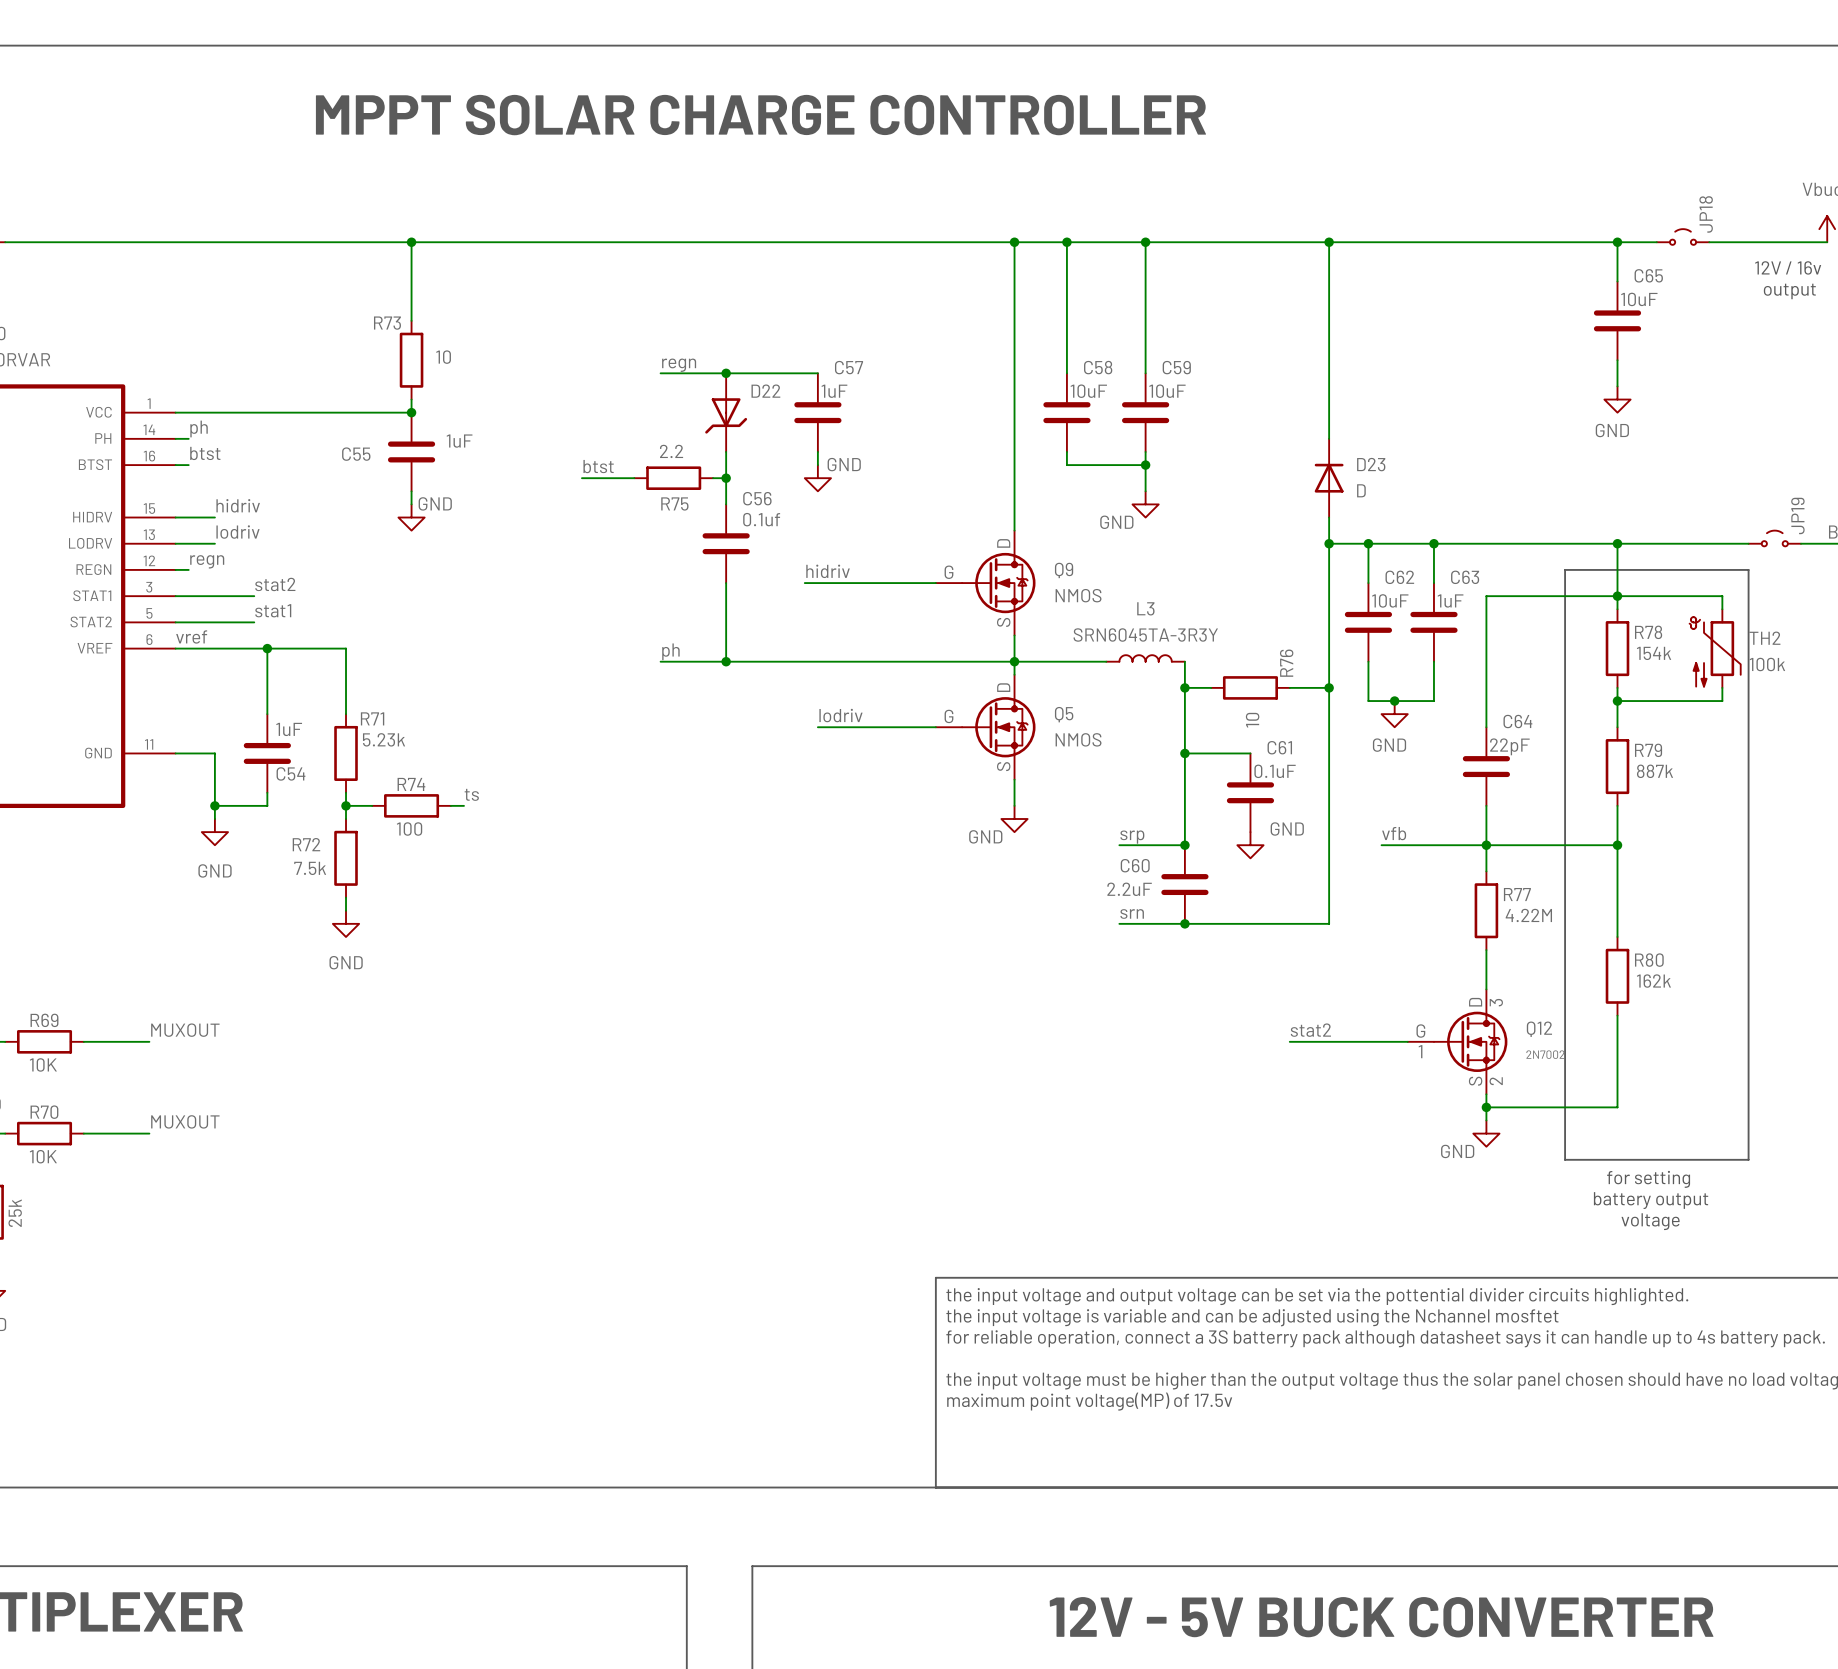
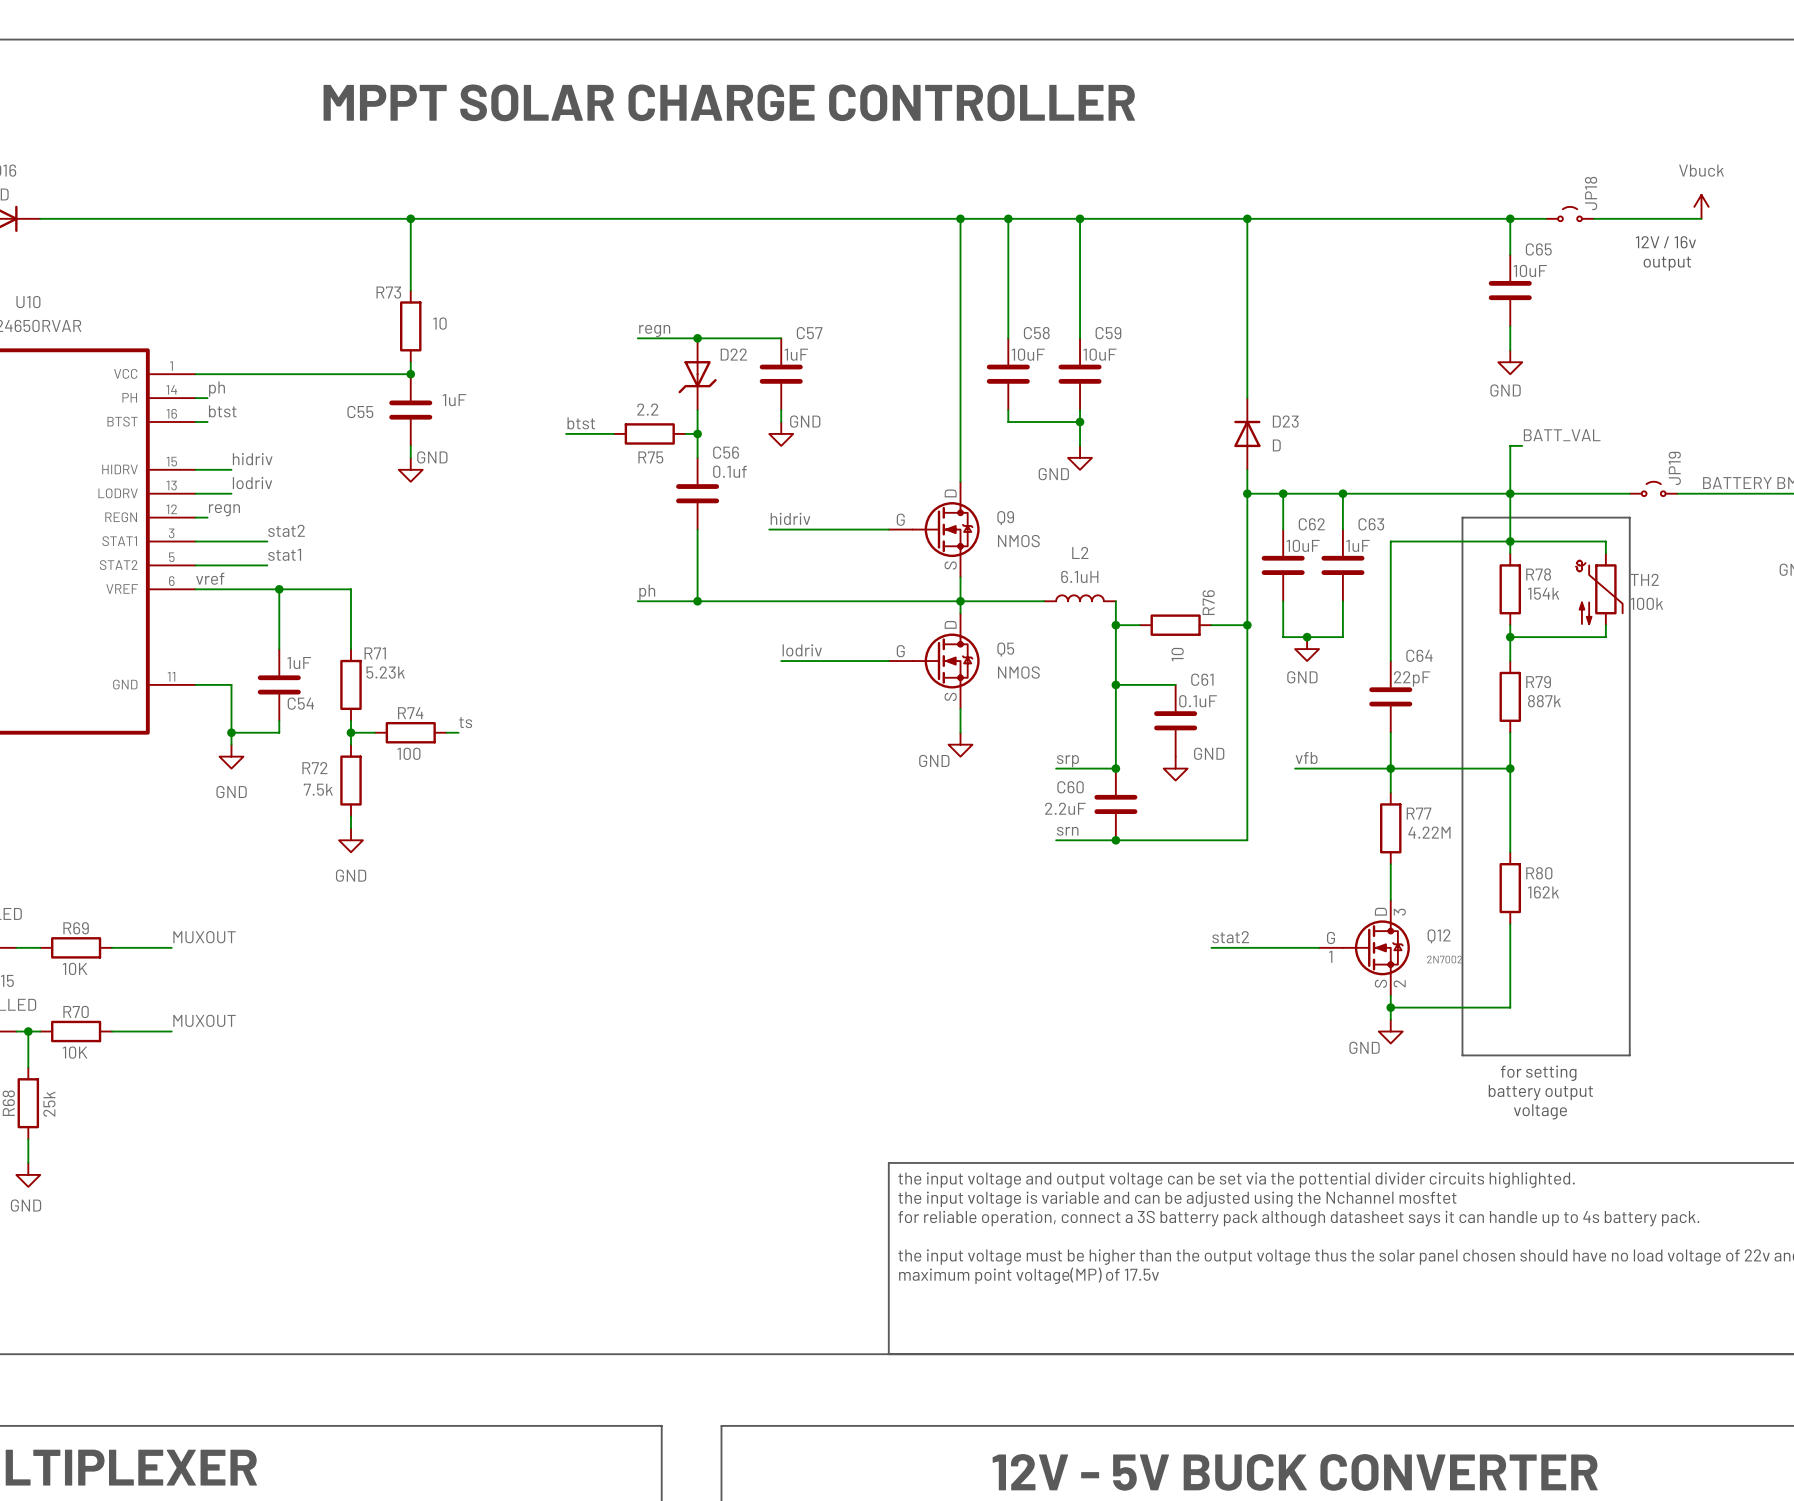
label: none -> BATT_VAL (1562, 435)
wire: none -> (1522, 445) (1510, 445) (1510, 493)
L3 name: L3 (1145, 608) -> L2 (1080, 552)
L3 value: SRN6045TA-3R3Y (1145, 635) -> 6.1uH (1079, 576)

